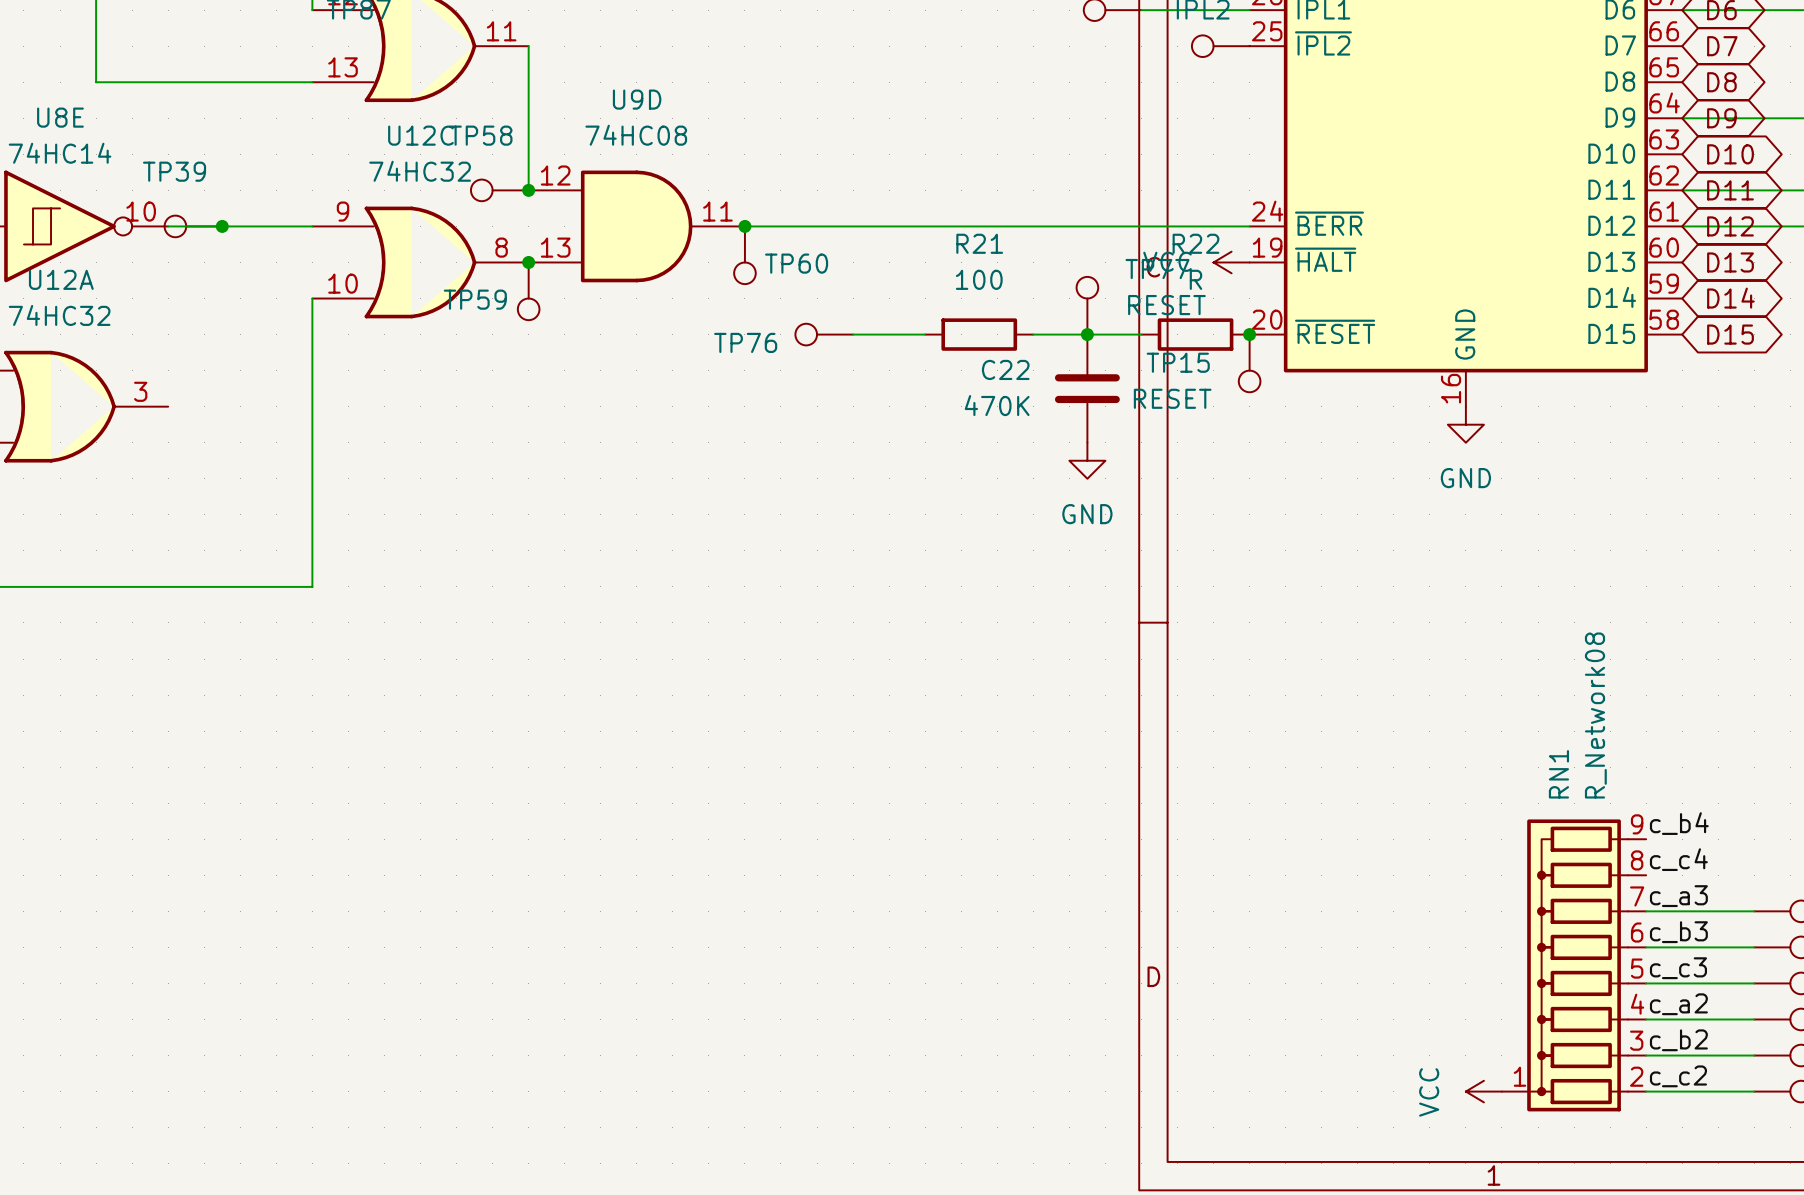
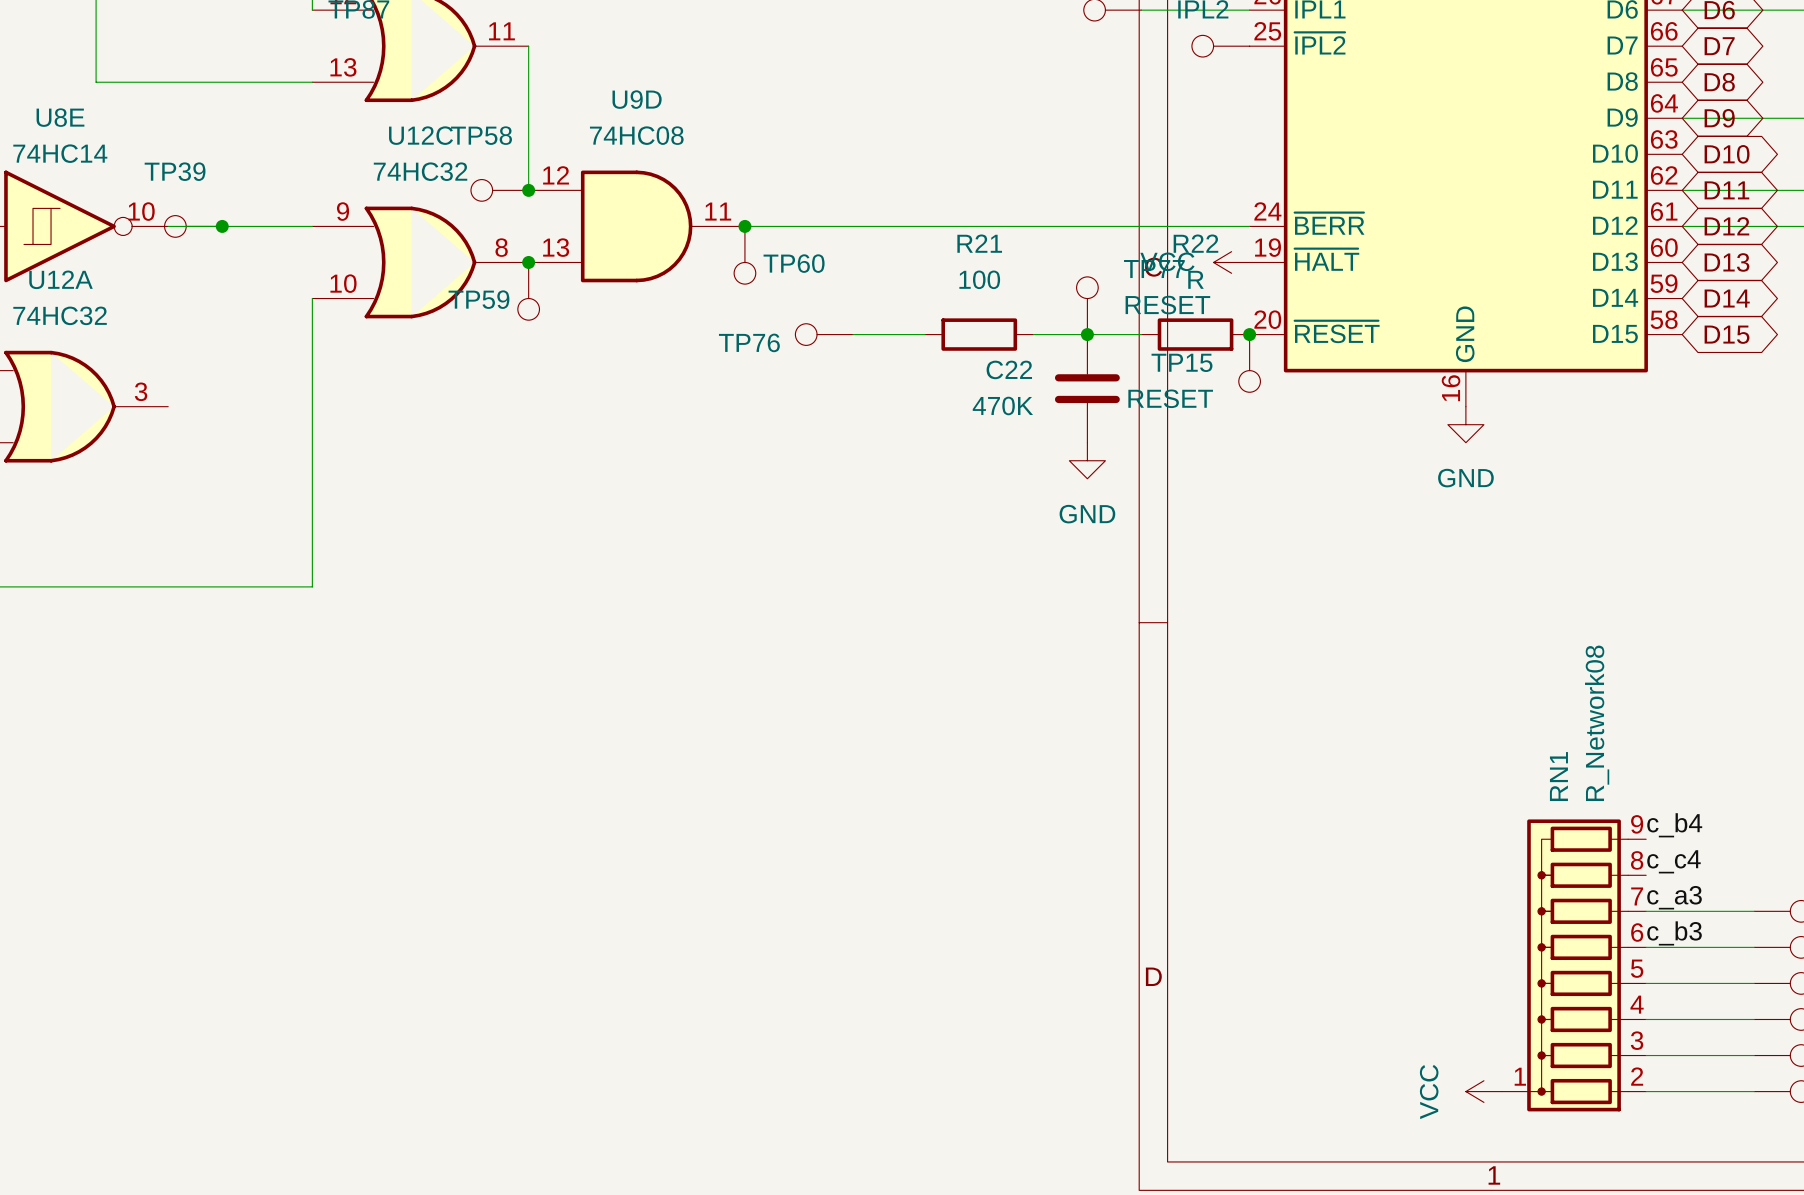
label: c_c3 (1678, 968) -> none
label: c_a2 (1678, 1004) -> none
label: c_b2 (1678, 1040) -> none
label: c_c2 (1678, 1076) -> none

